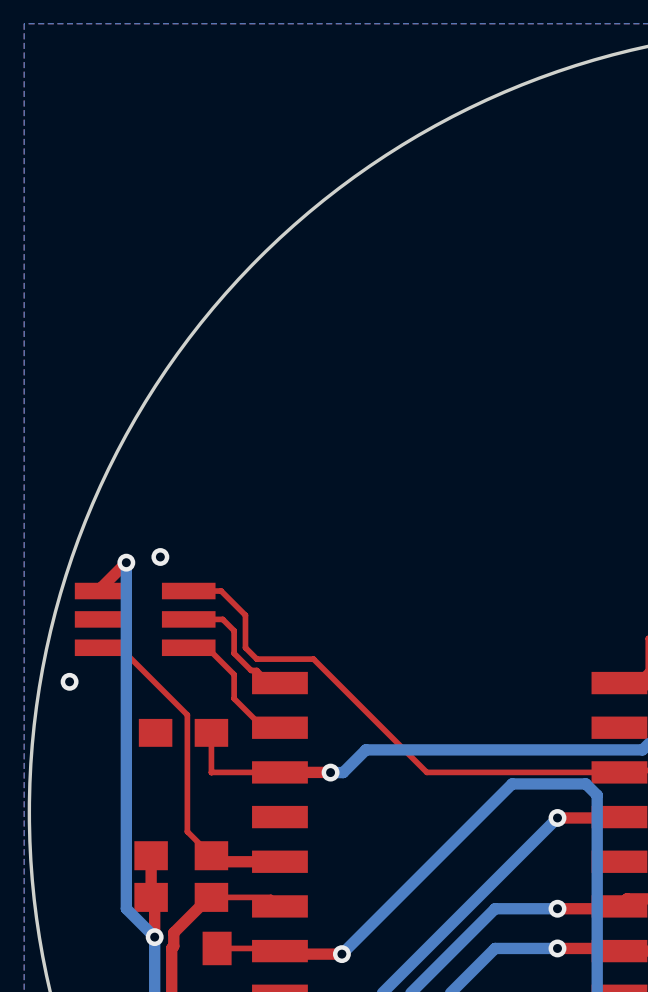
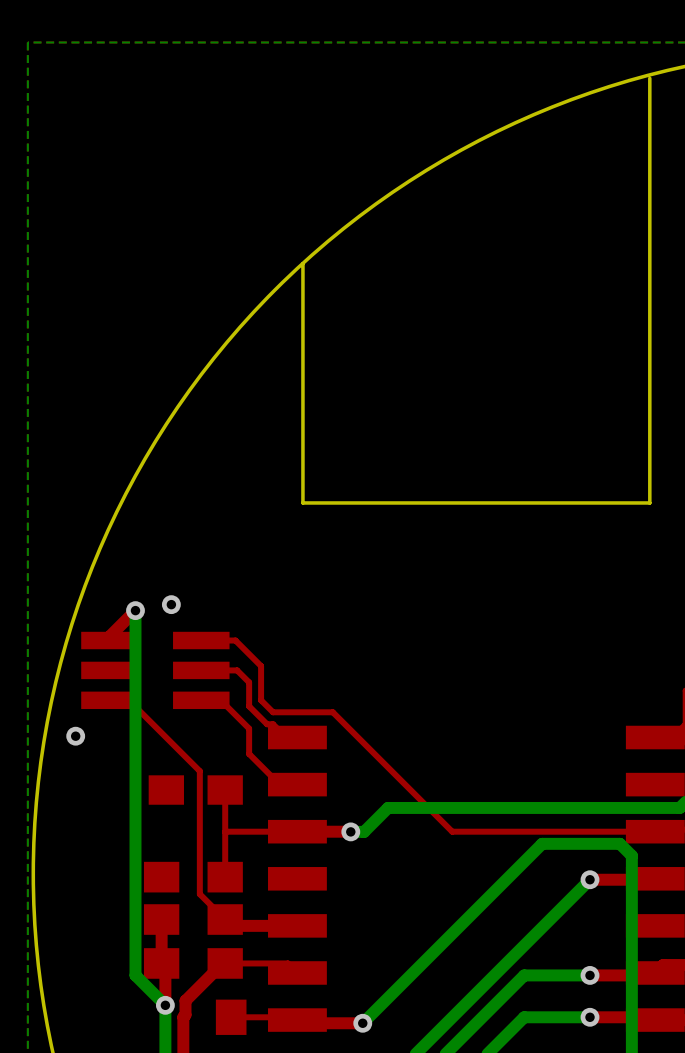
board edge: none -> (649, 78) (649, 502) (302, 502) (302, 263)
top track: none -> (225, 831) (225, 877)
part: none -> (193, 877)

